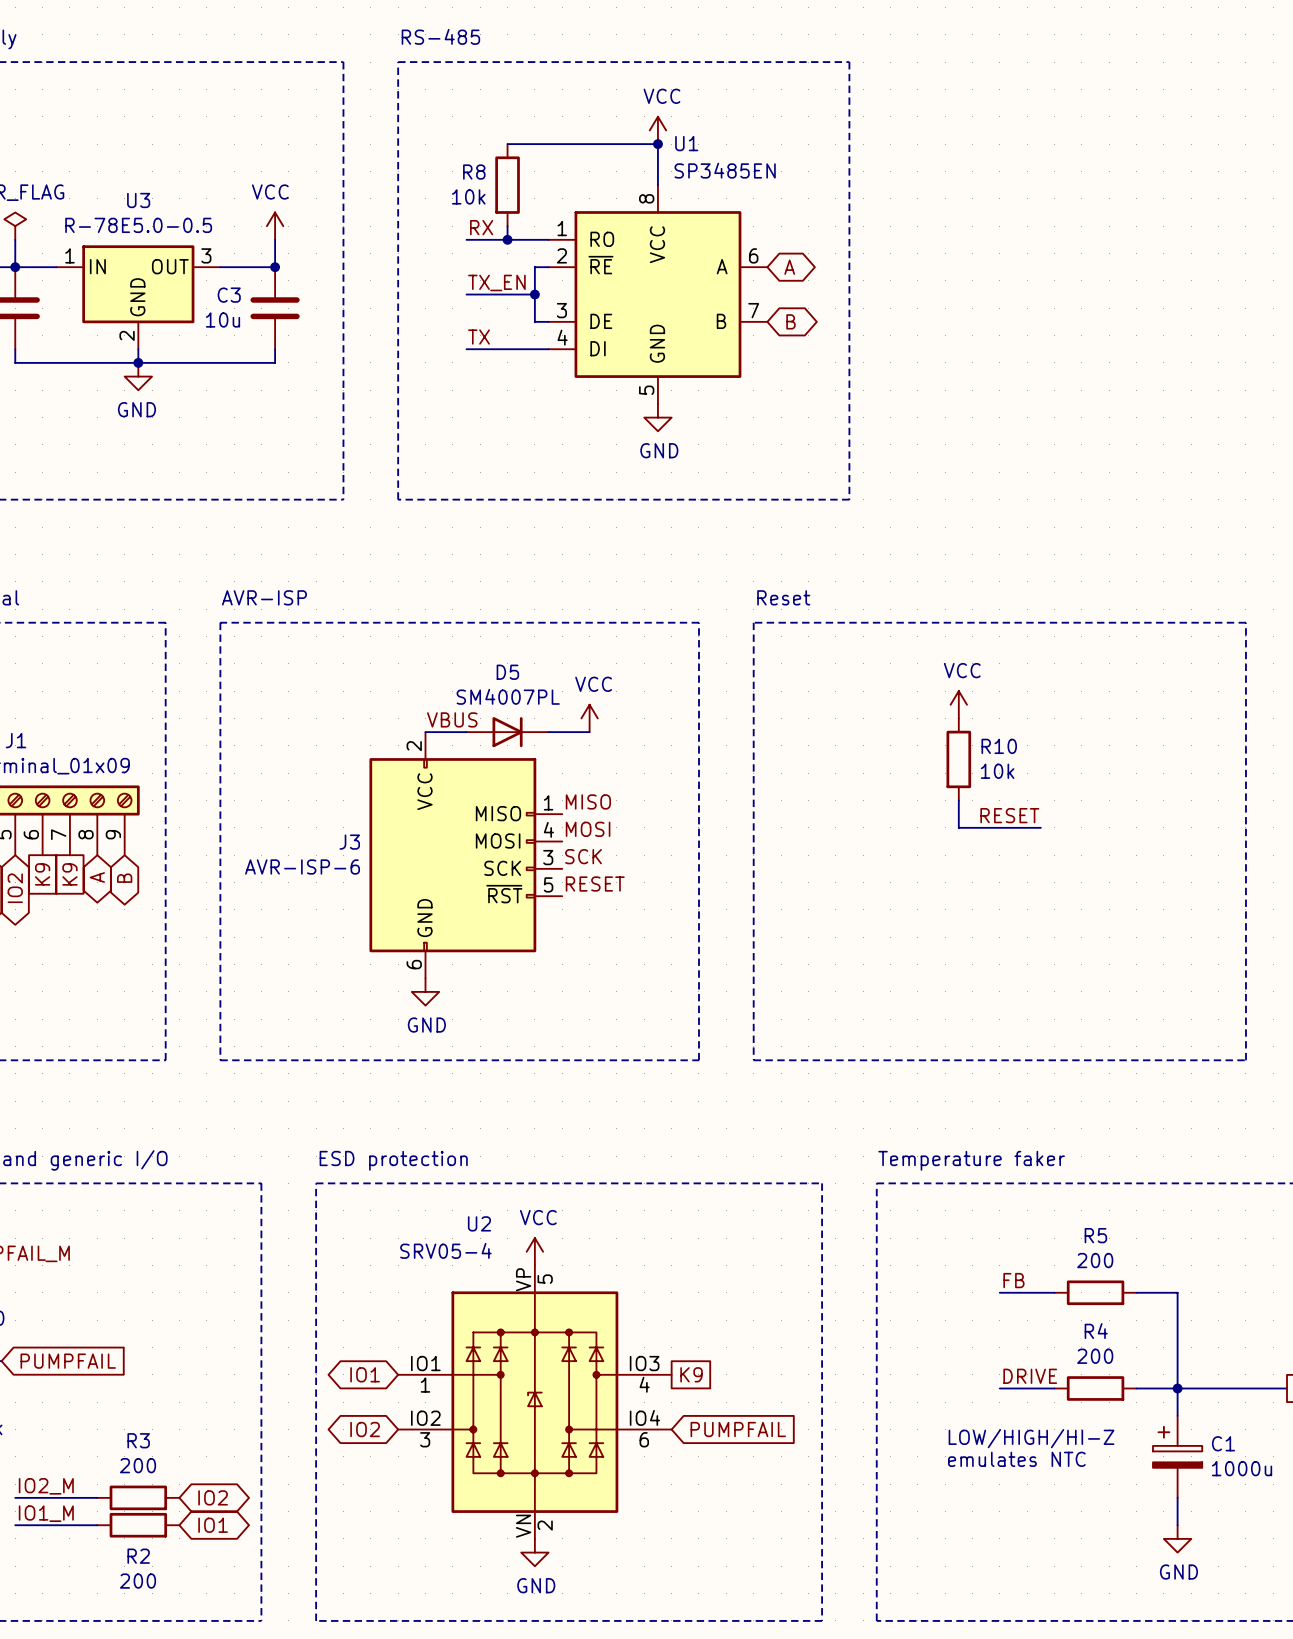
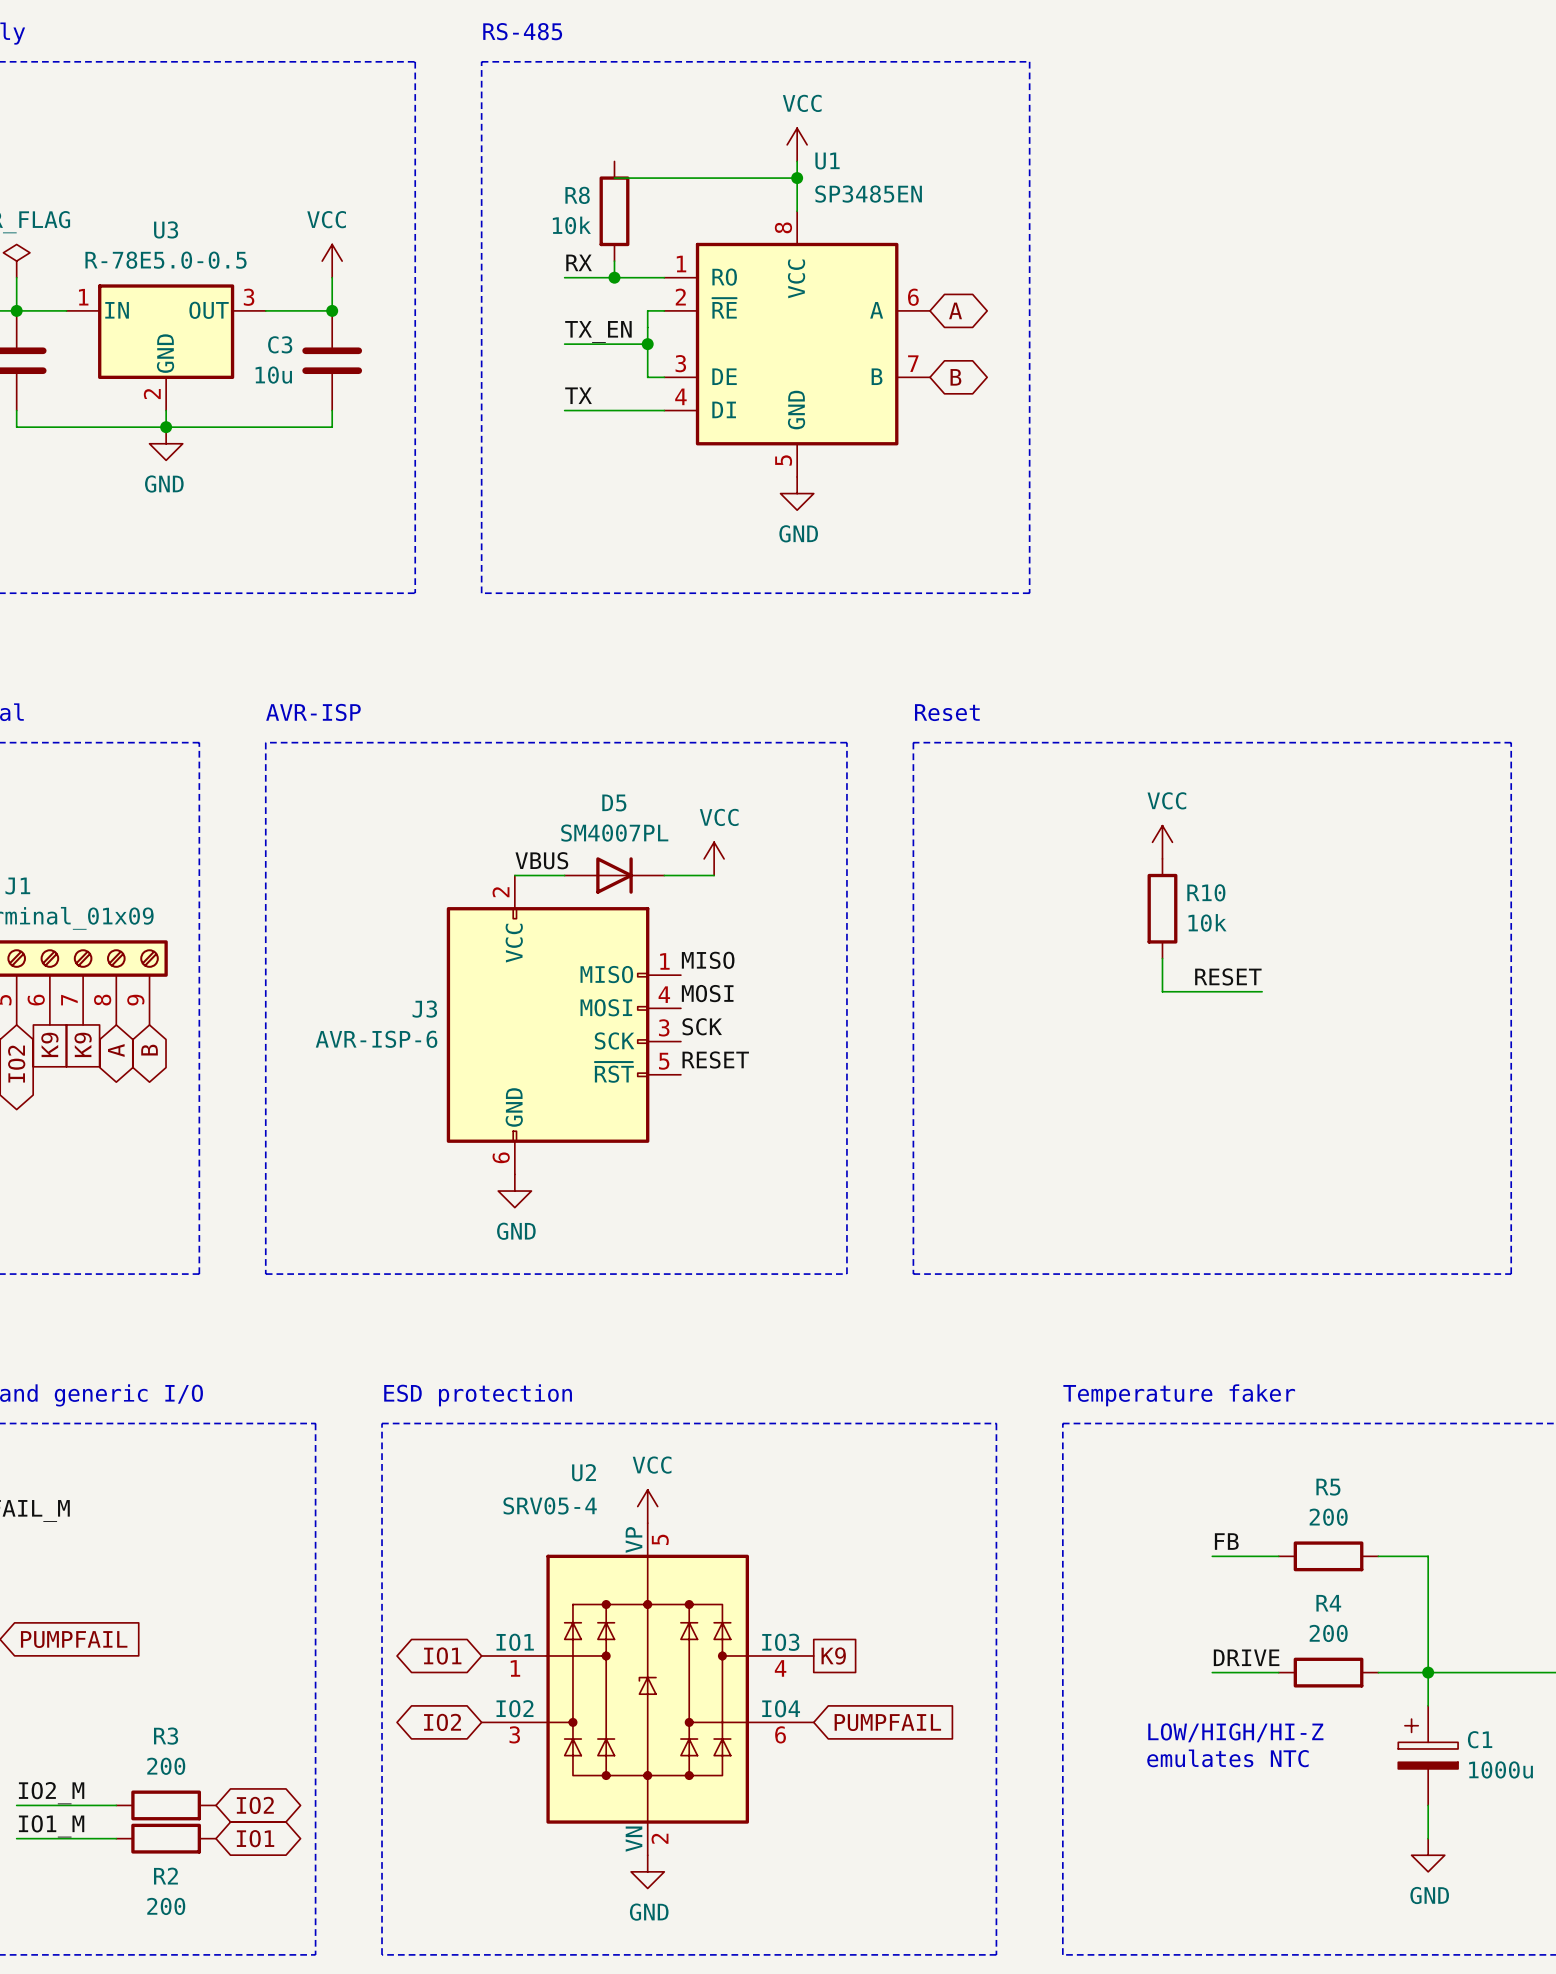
wire: (507, 144) (657, 144) -> (614, 178) (797, 178)
junction position: (657, 144) -> (797, 178)

